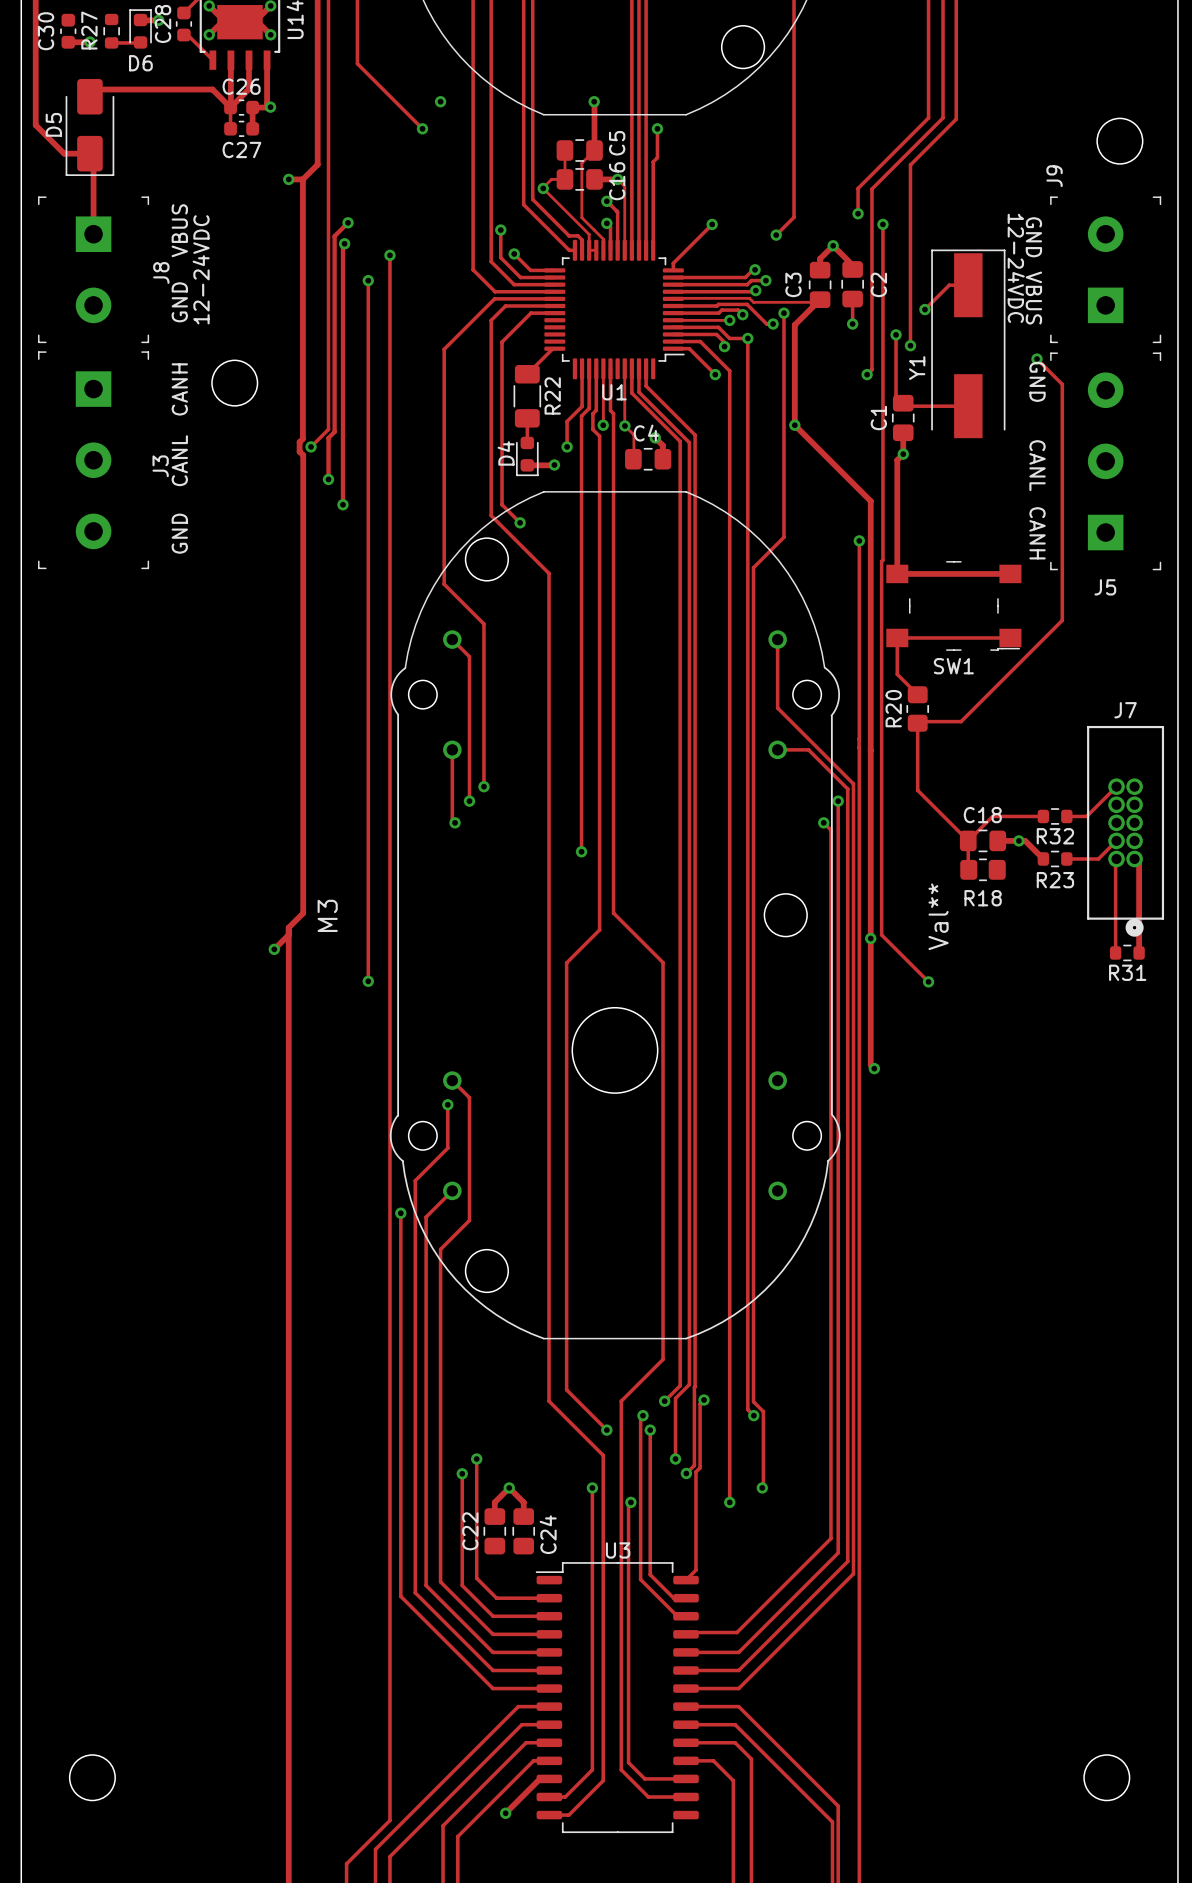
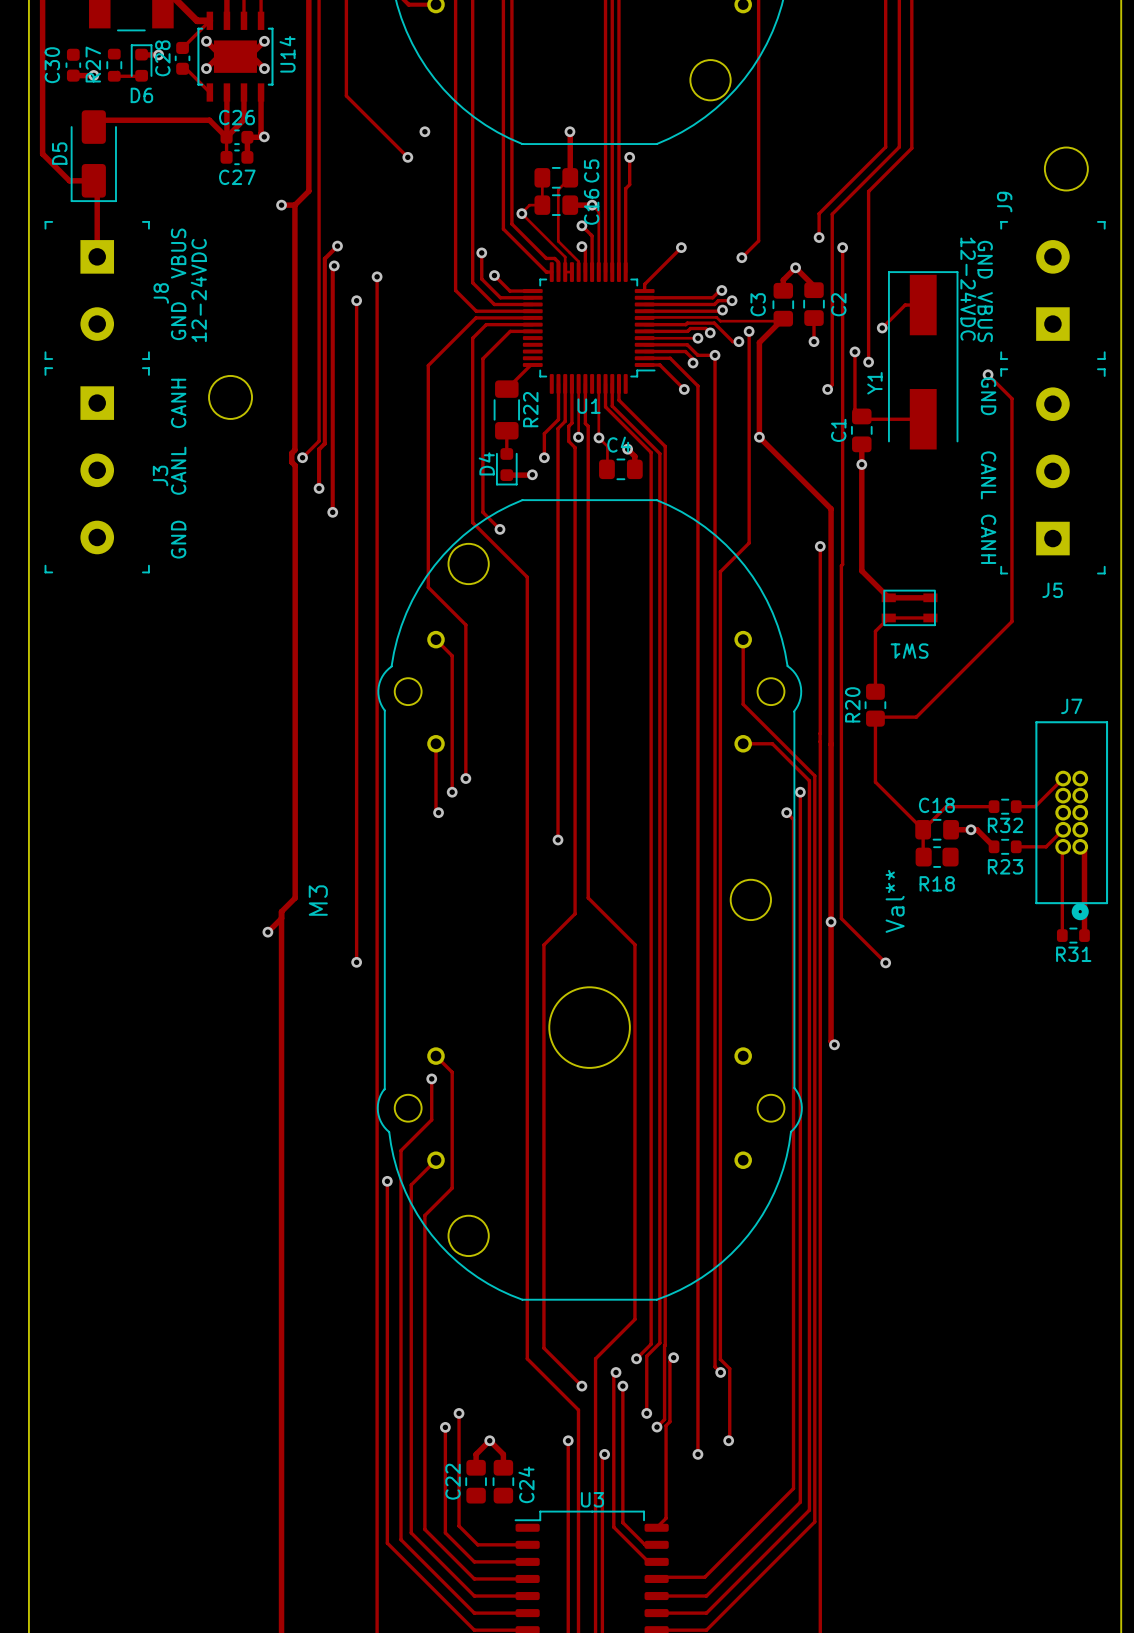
track: (903, 454) (897, 460) (897, 573) (1010, 573) -> (861, 464) (861, 570) (888, 597) (930, 597)
SW1 footprint: [886, 561, 1022, 651] -> [881, 589, 938, 626]
track: (1010, 637) (897, 637) (897, 674) (917, 694) -> (930, 617) (888, 617) (875, 631) (875, 691)

